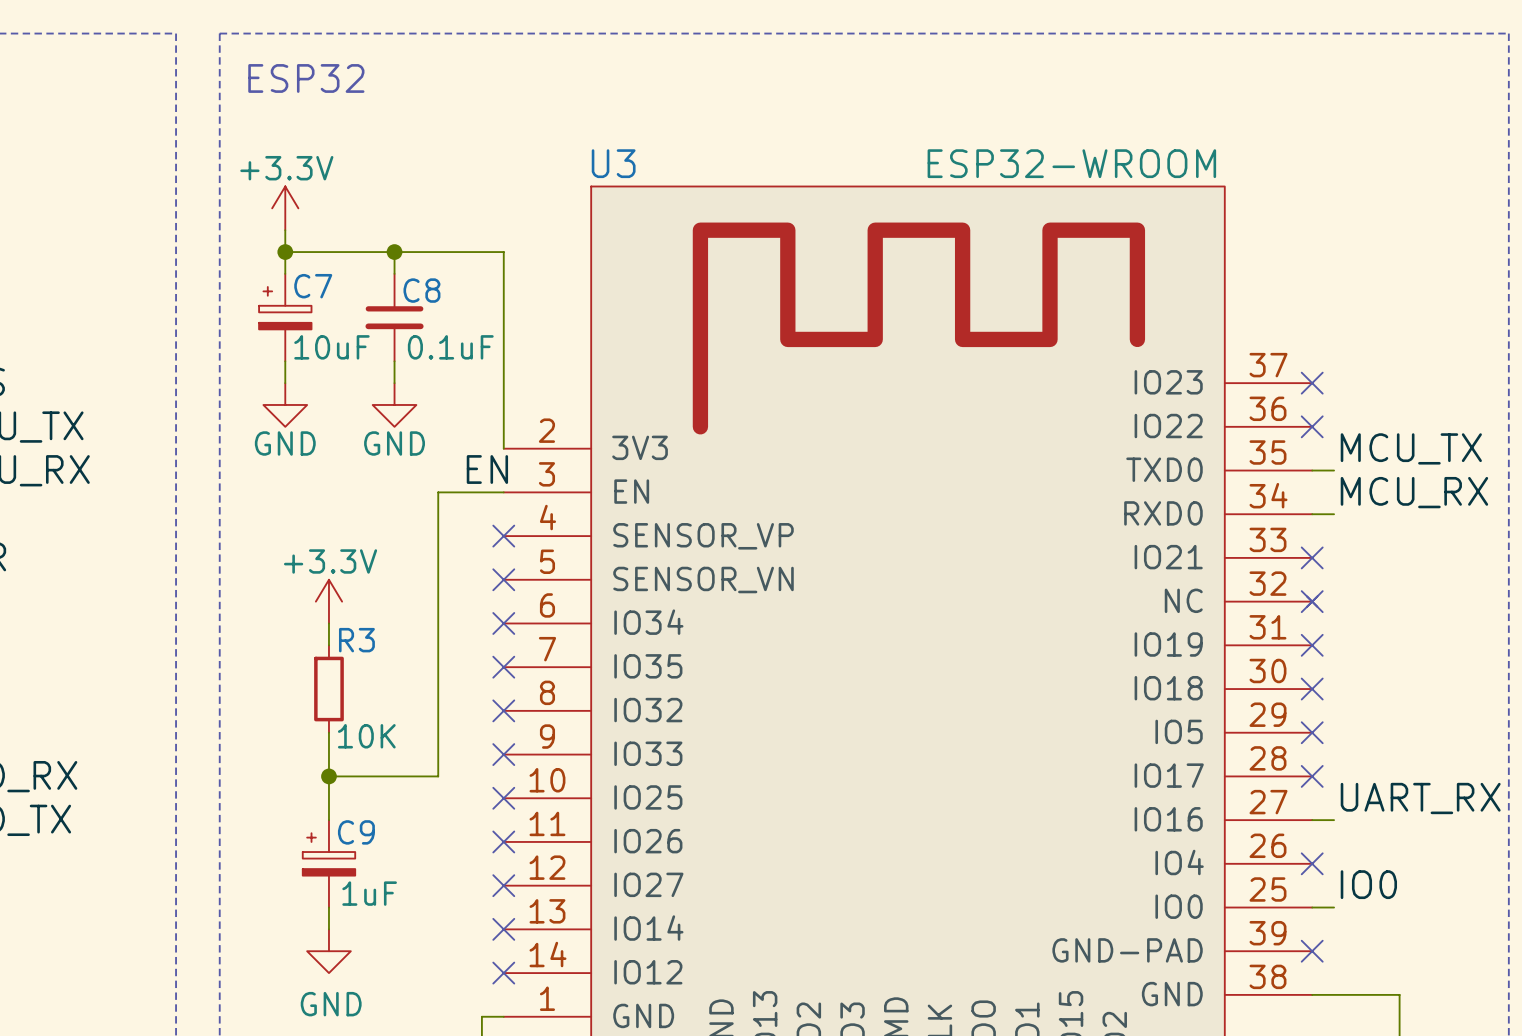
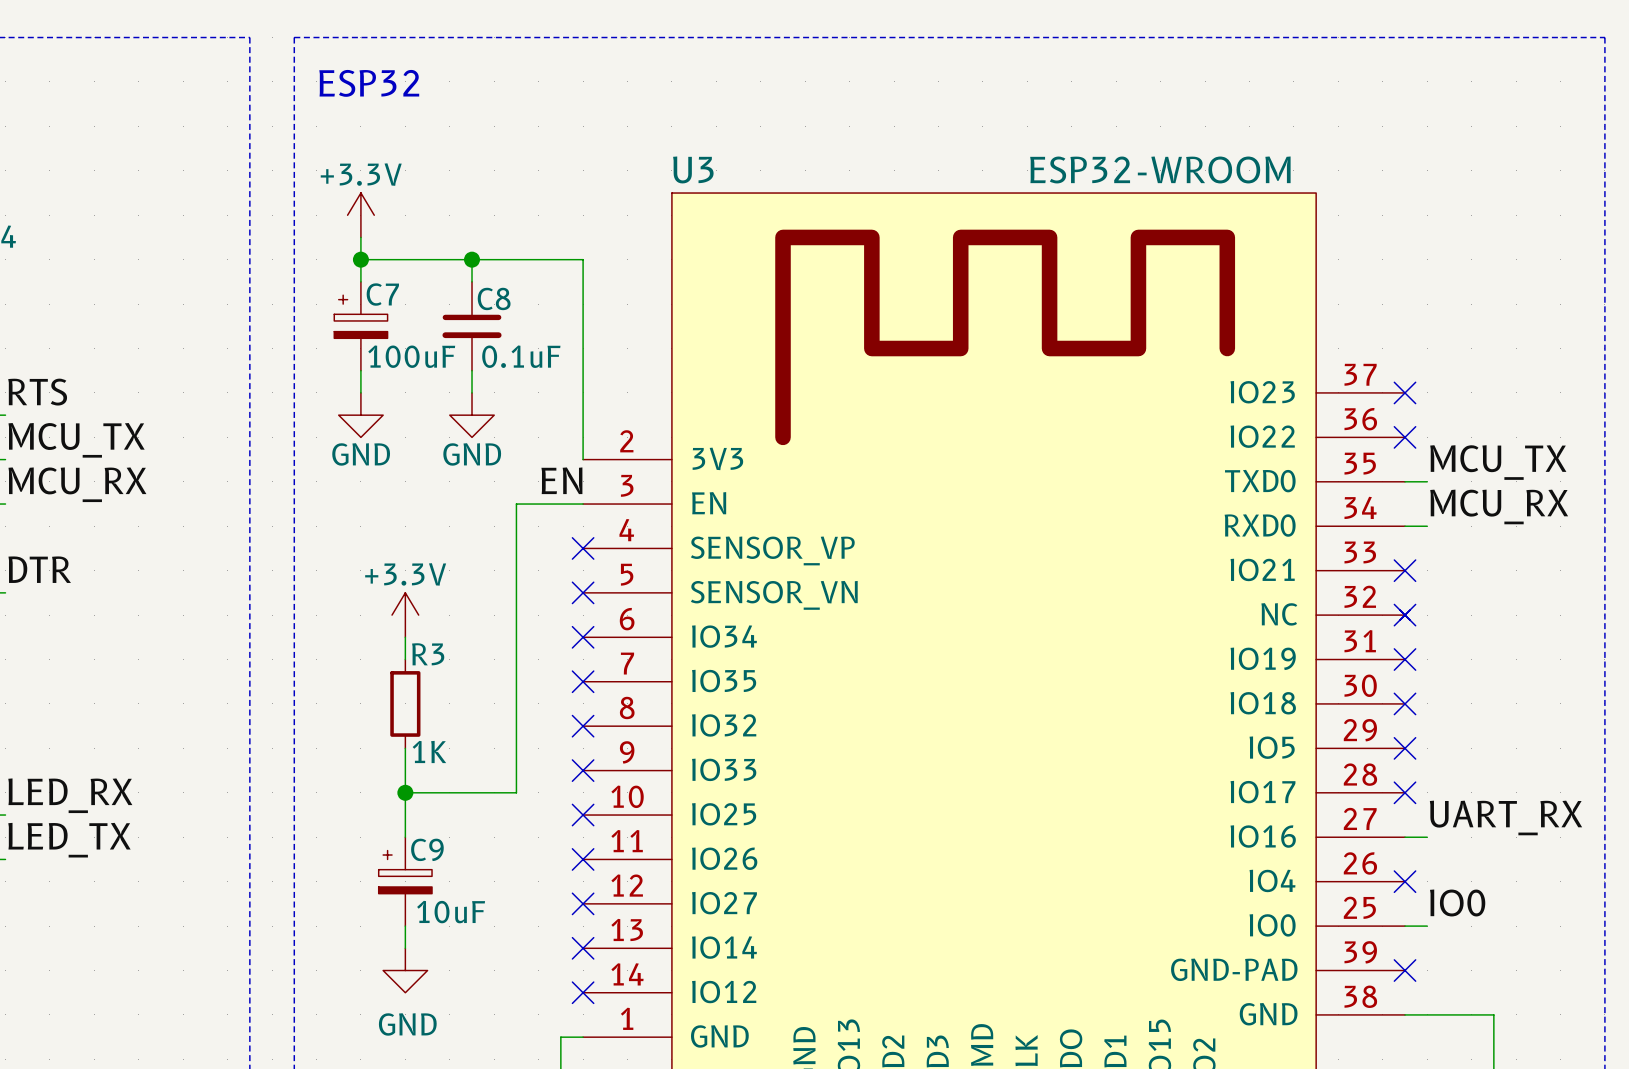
C7 value: 10uF (331, 347) -> 100uF (411, 356)
R3 value: 10K (366, 736) -> 1K (429, 751)
C9 value: 1uF (369, 893) -> 10uF (451, 912)

